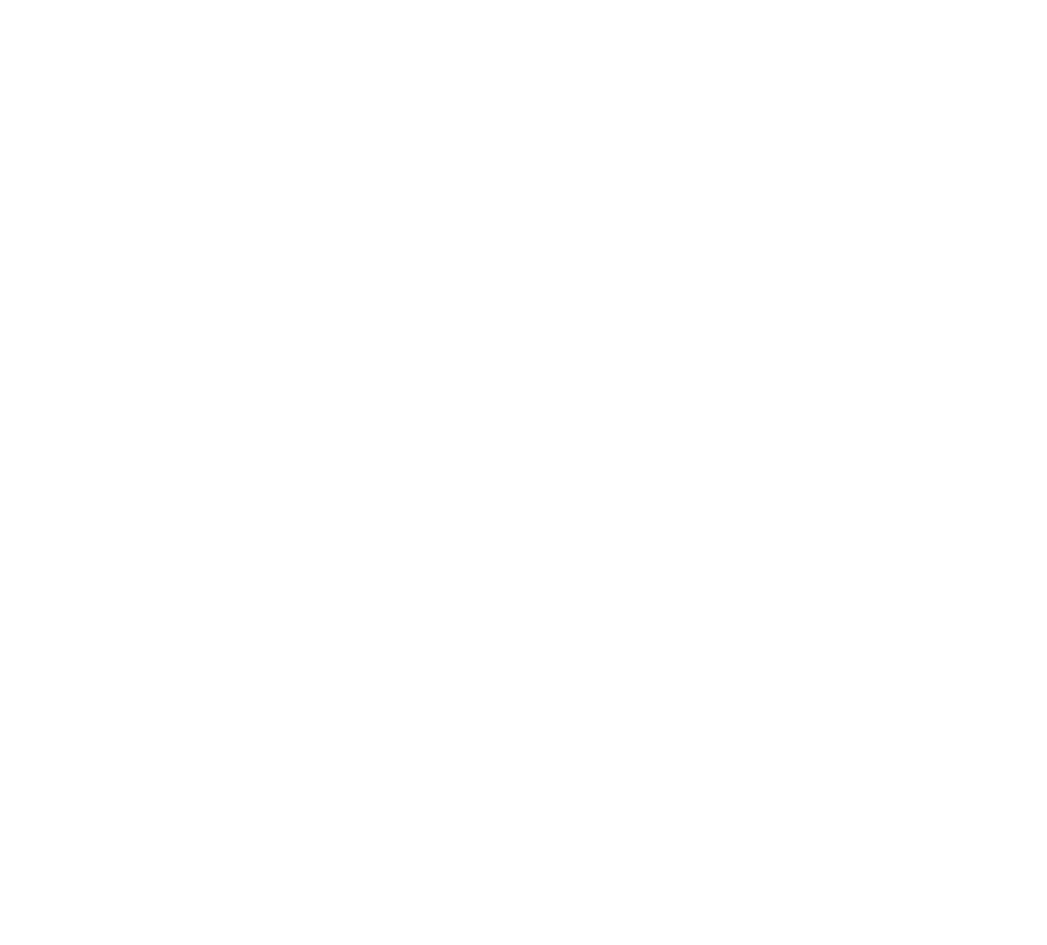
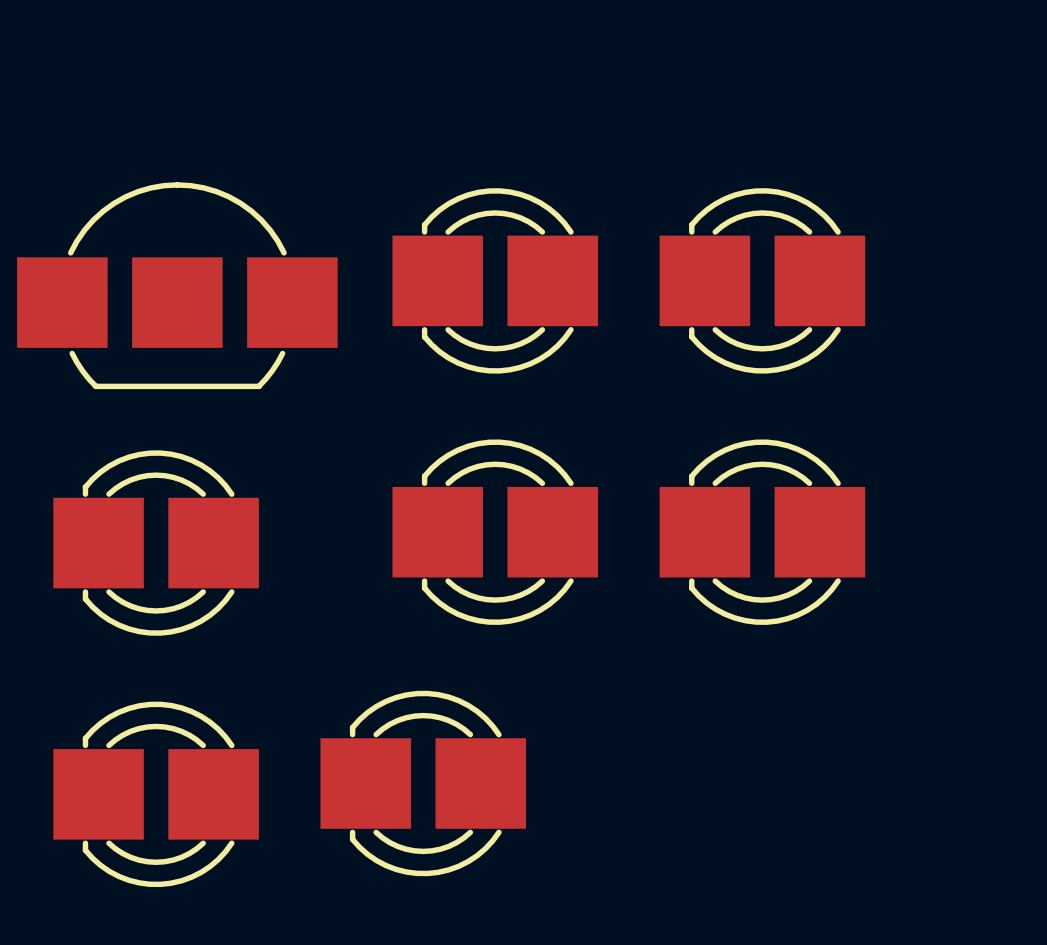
part: none -> (495, 280)
part: none -> (762, 280)
part: none -> (177, 285)
part: none -> (495, 532)
part: none -> (762, 532)
part: none -> (156, 543)
part: none -> (423, 783)
part: none -> (156, 794)

